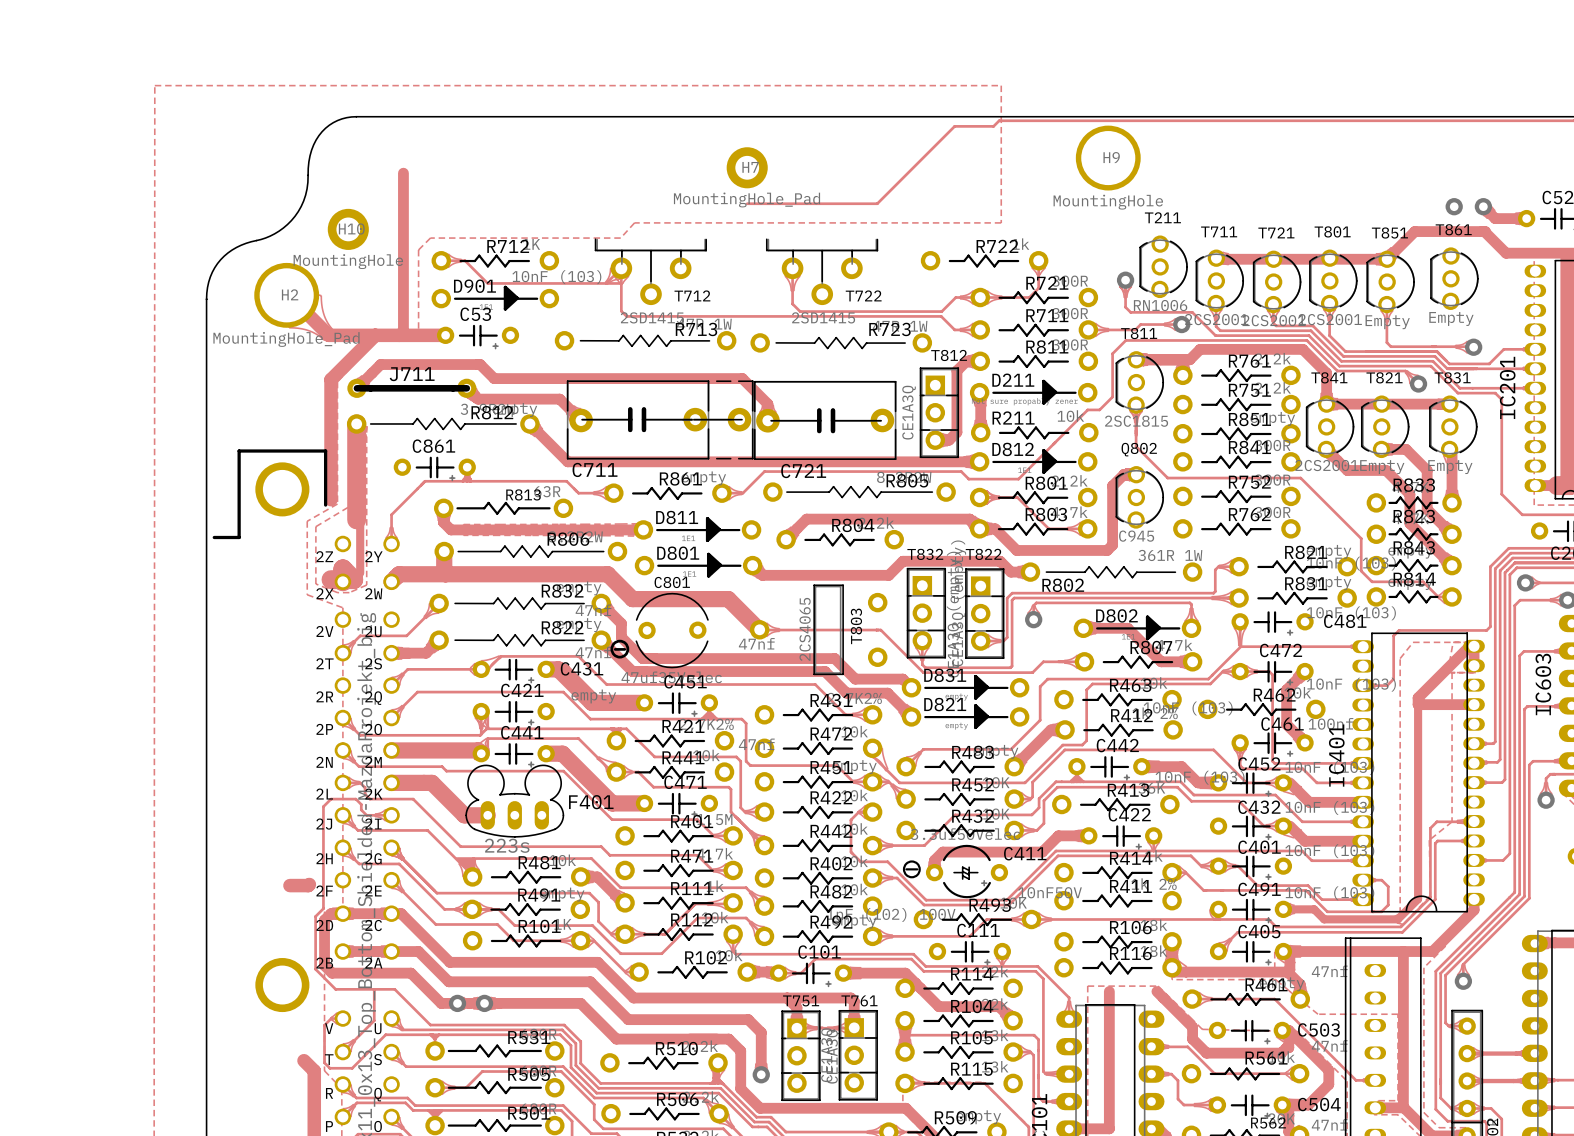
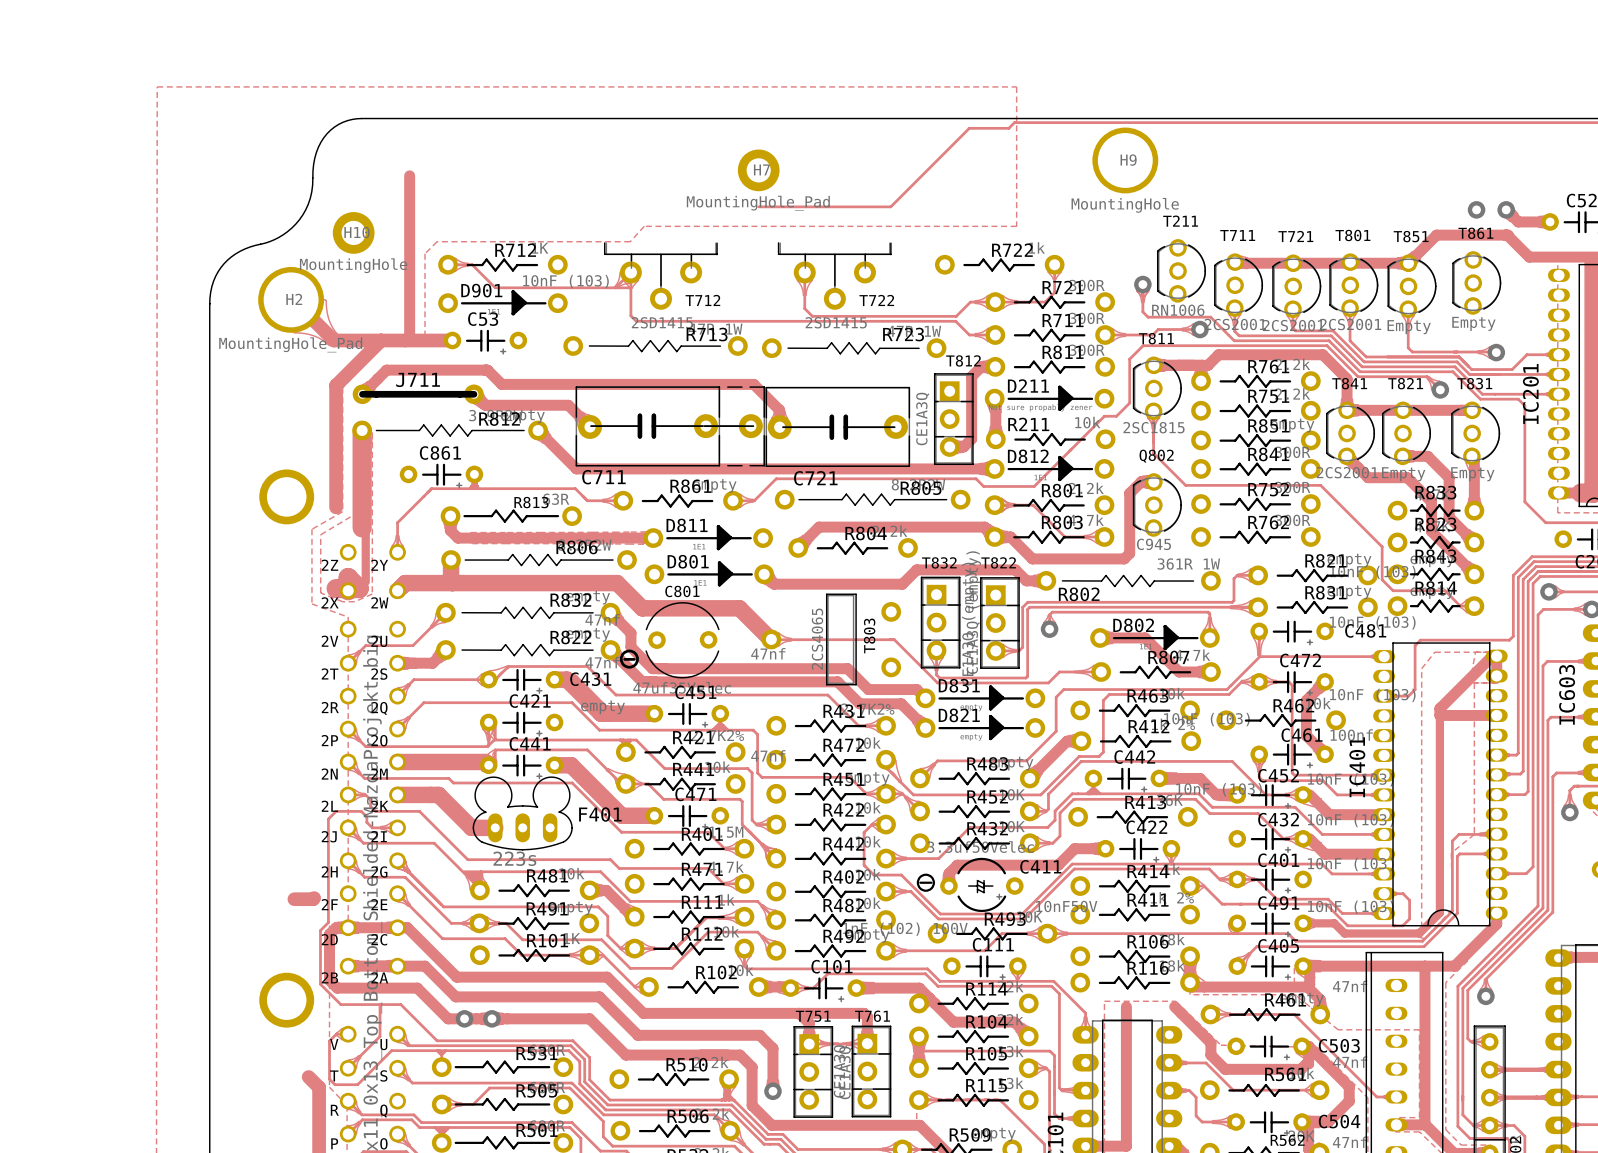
line: (325, 505) (325, 451) (239, 451) (239, 537) (214, 537) -> none

